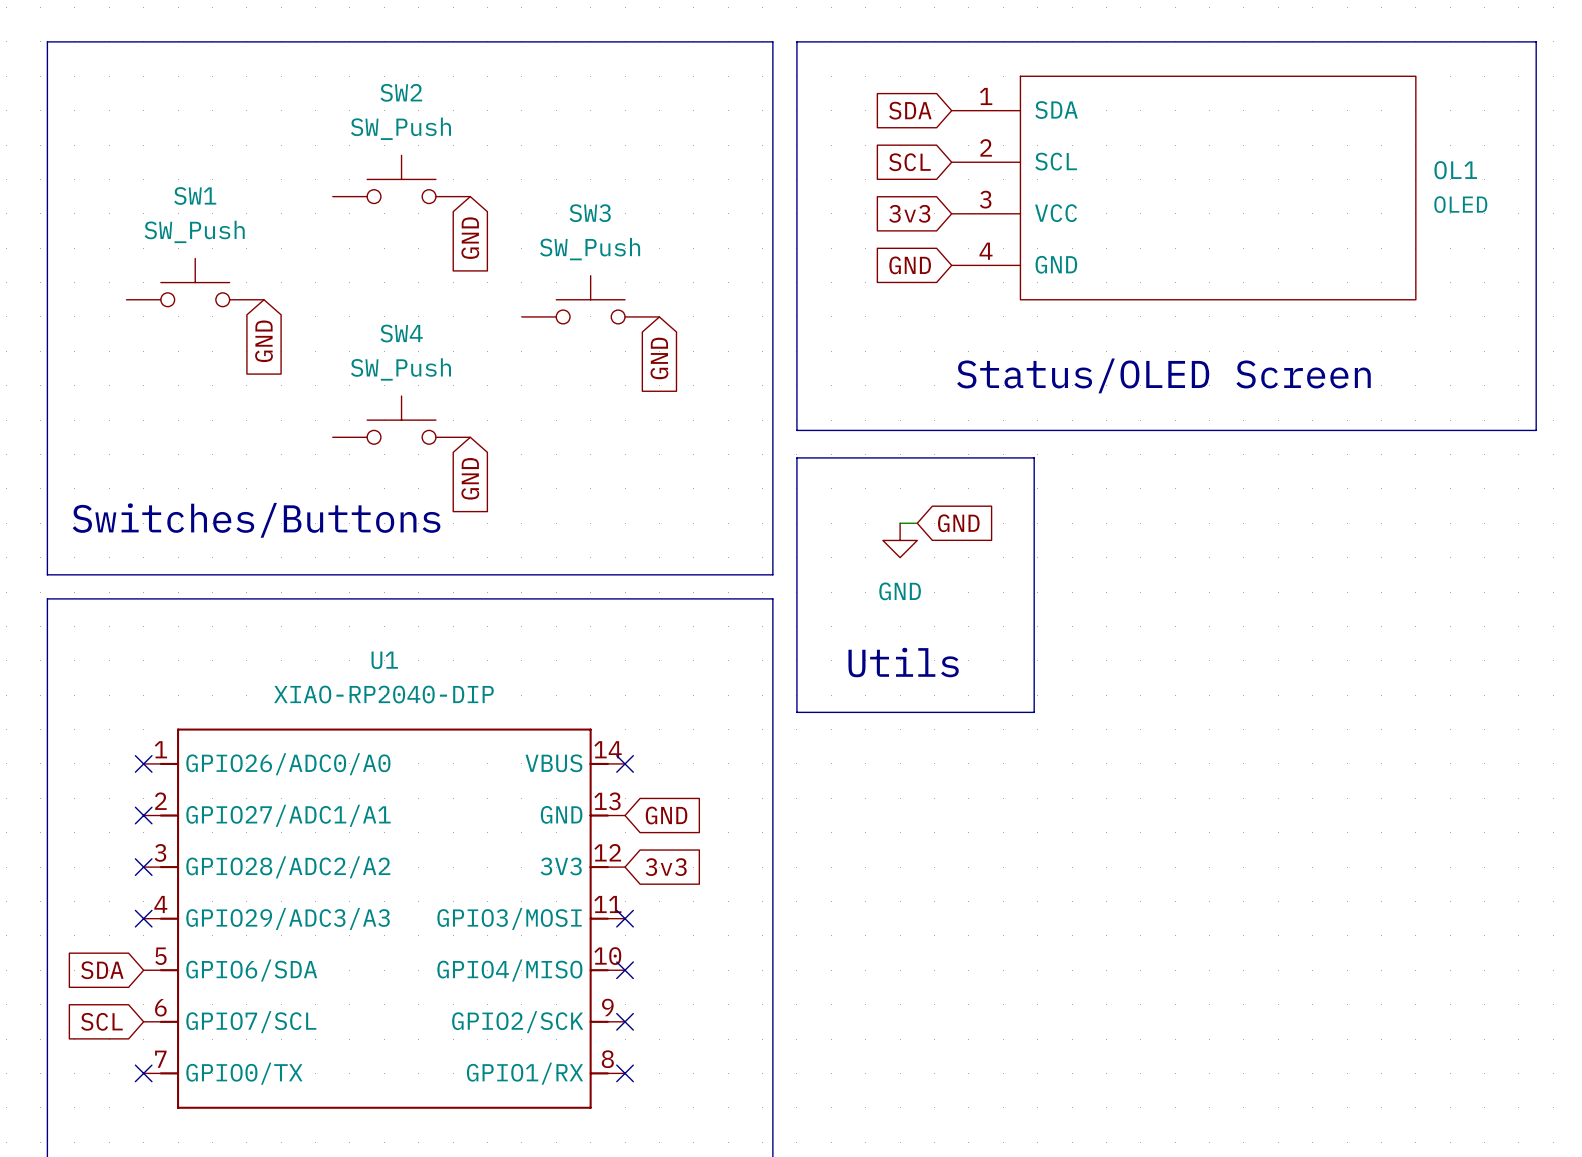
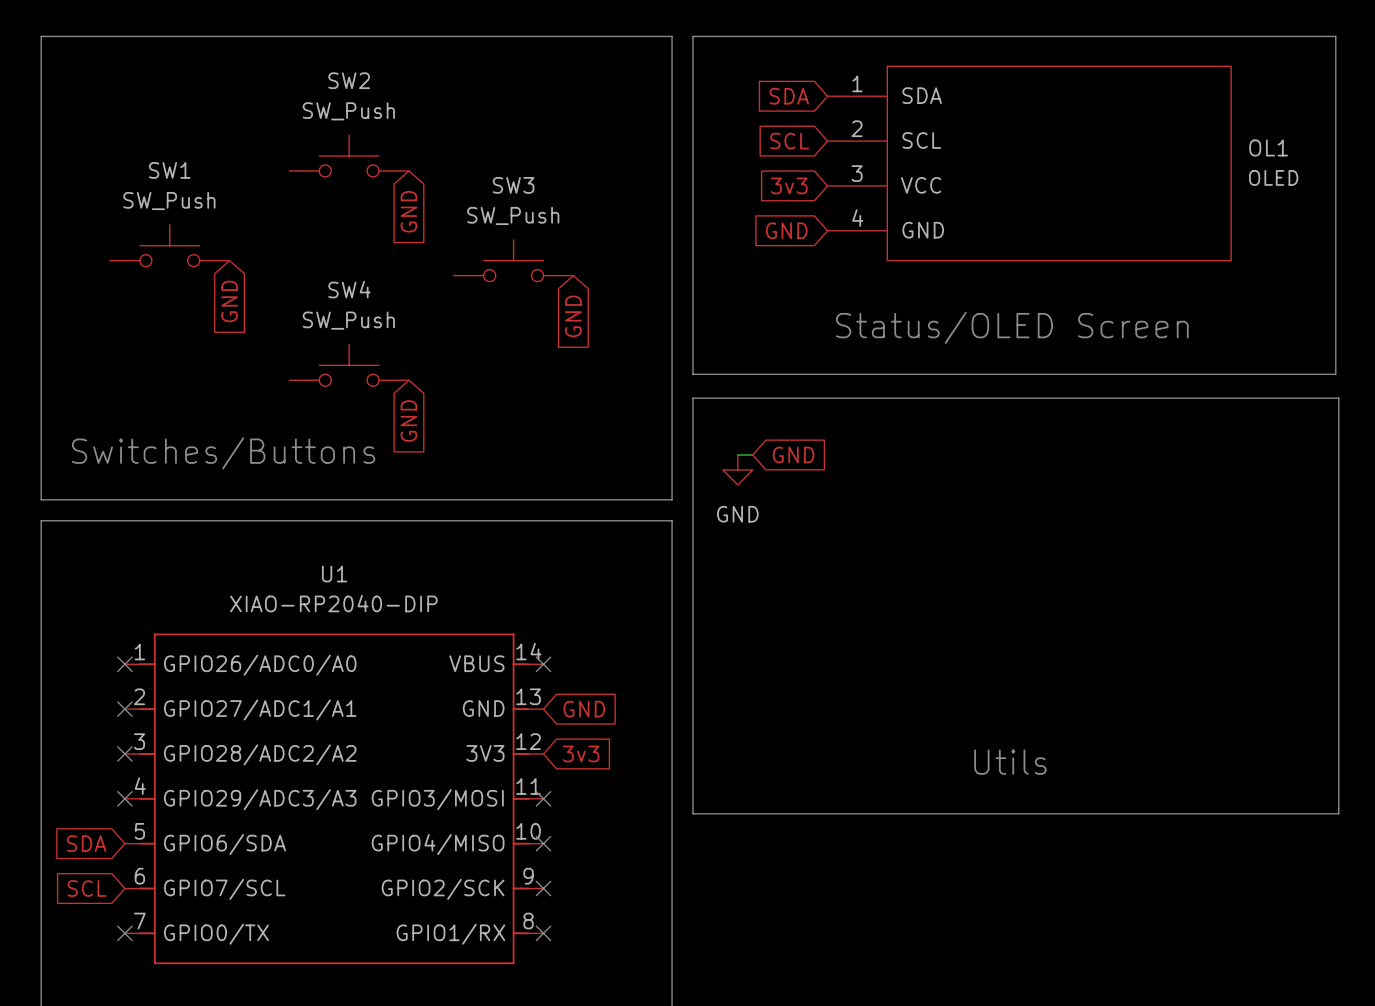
line: (1034, 457) (1034, 712) (796, 712) -> (899, 398) (1338, 398) (1338, 813) (692, 813) (692, 619)
wire: (900, 523) (917, 523) -> (737, 454) (752, 454)
global label position: GND (958, 523) -> GND (793, 454)
power symbol position: GND (900, 540) -> GND (737, 469)
text position: Utils (903, 662) -> Utils (1010, 762)

